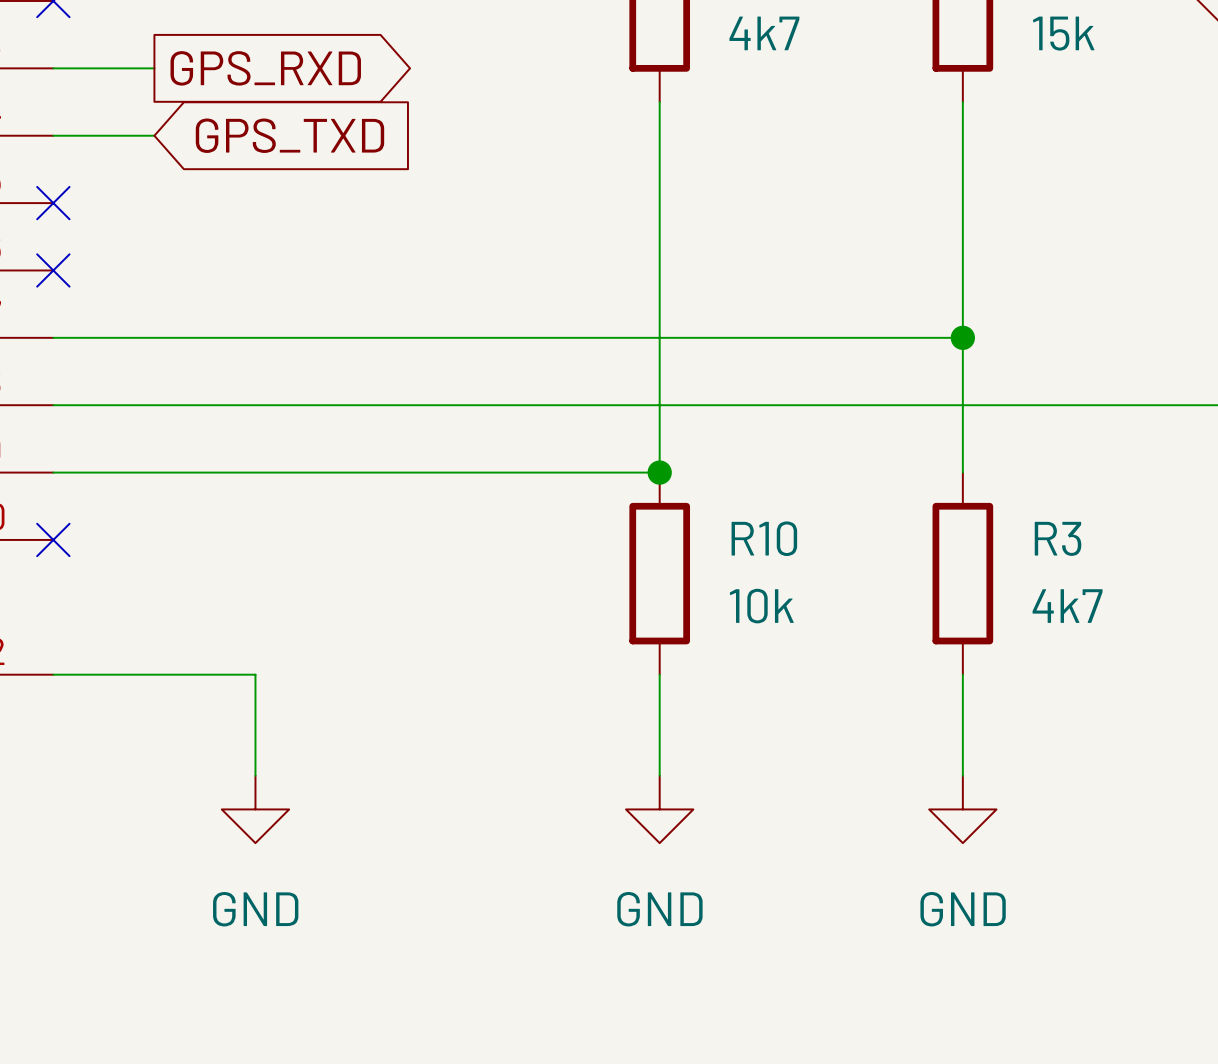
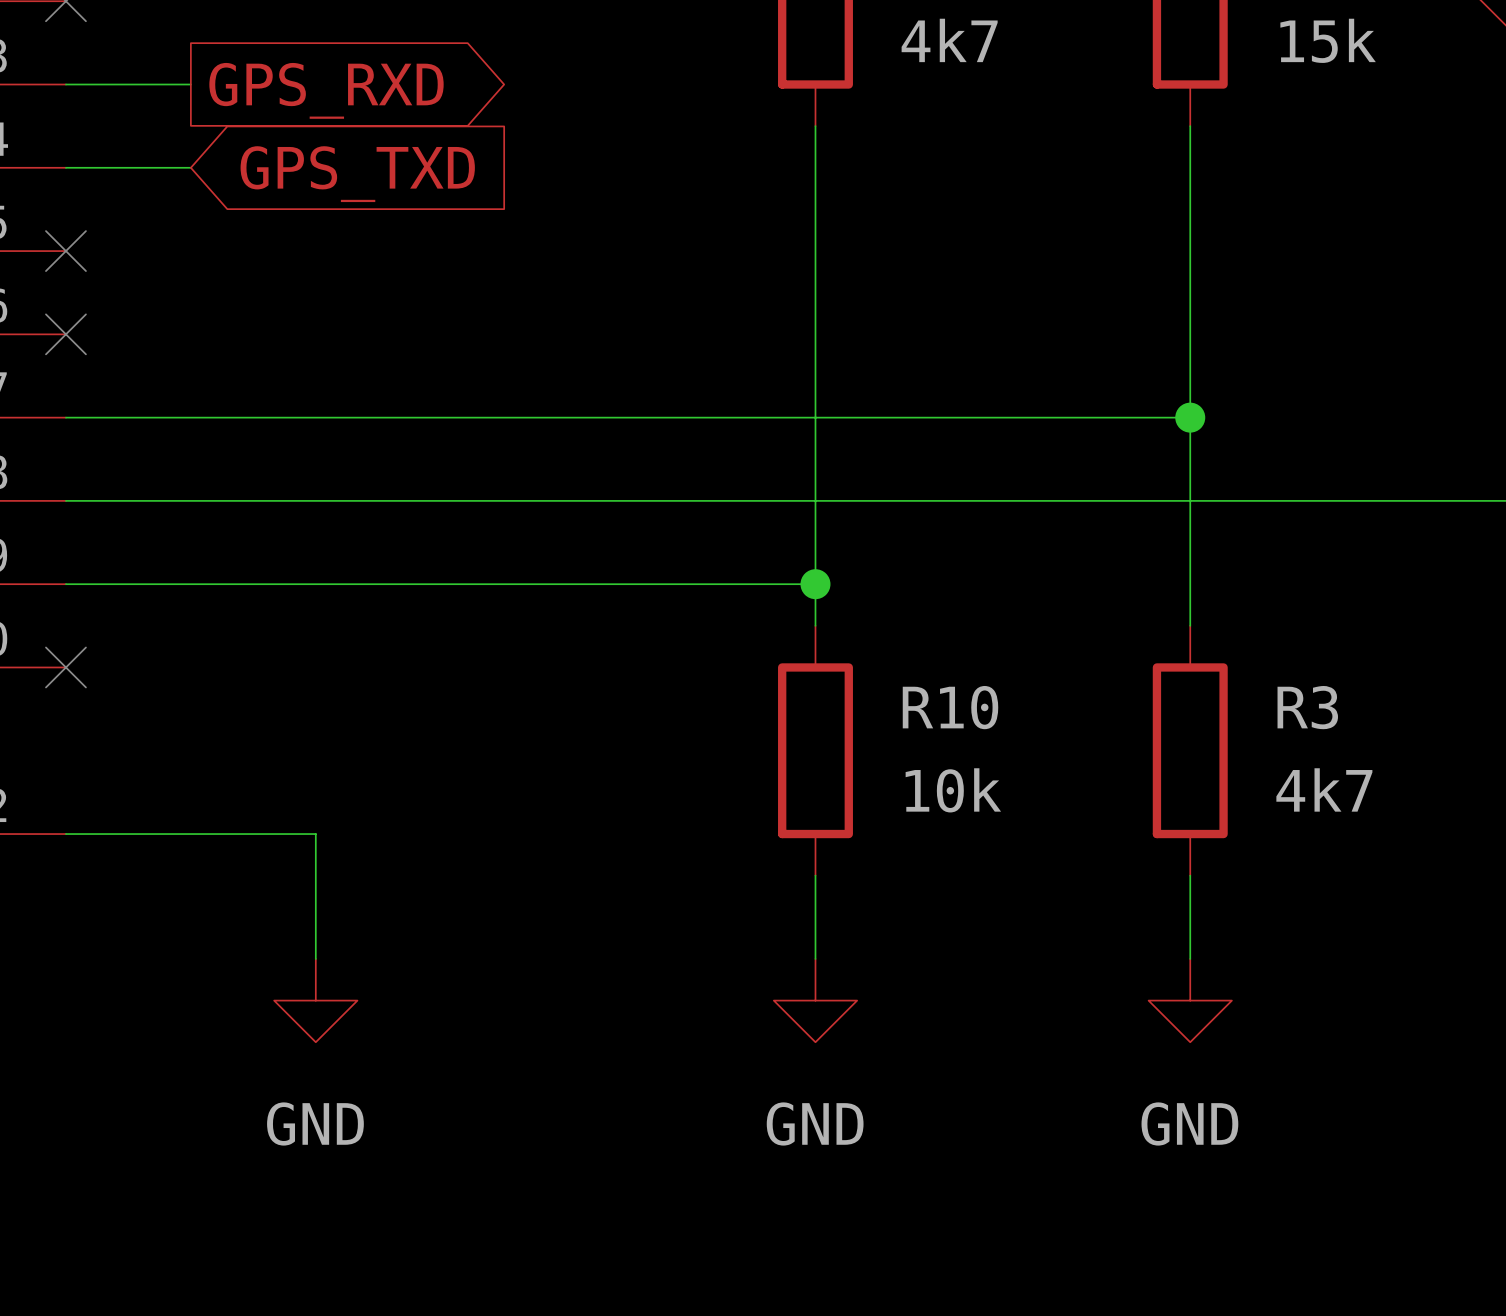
R10 position: (659, 573) -> (815, 750)
R3 position: (962, 573) -> (1190, 750)

